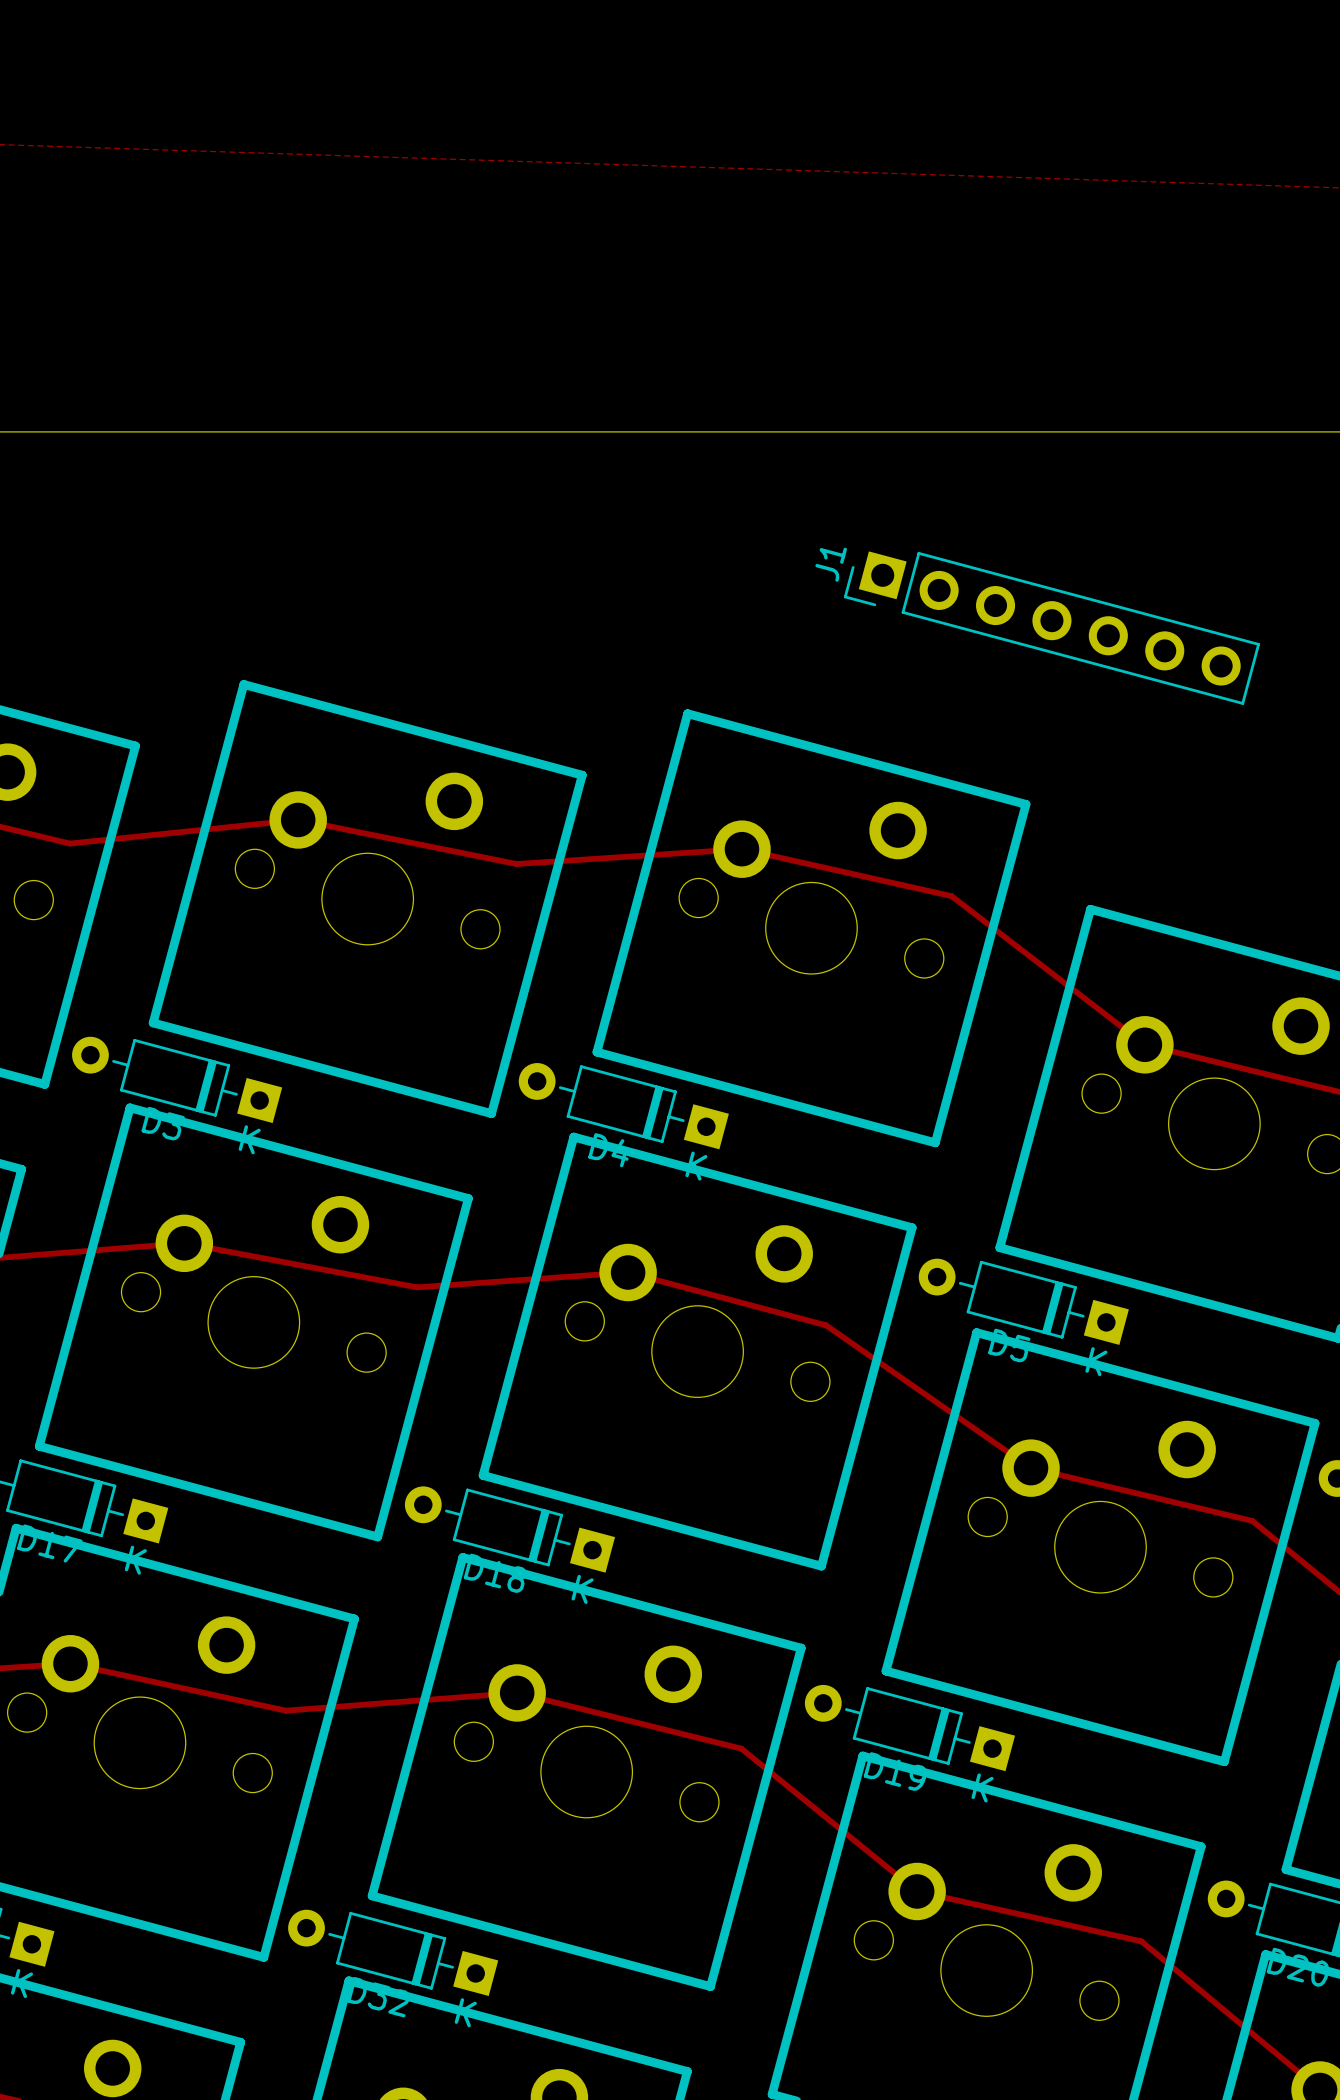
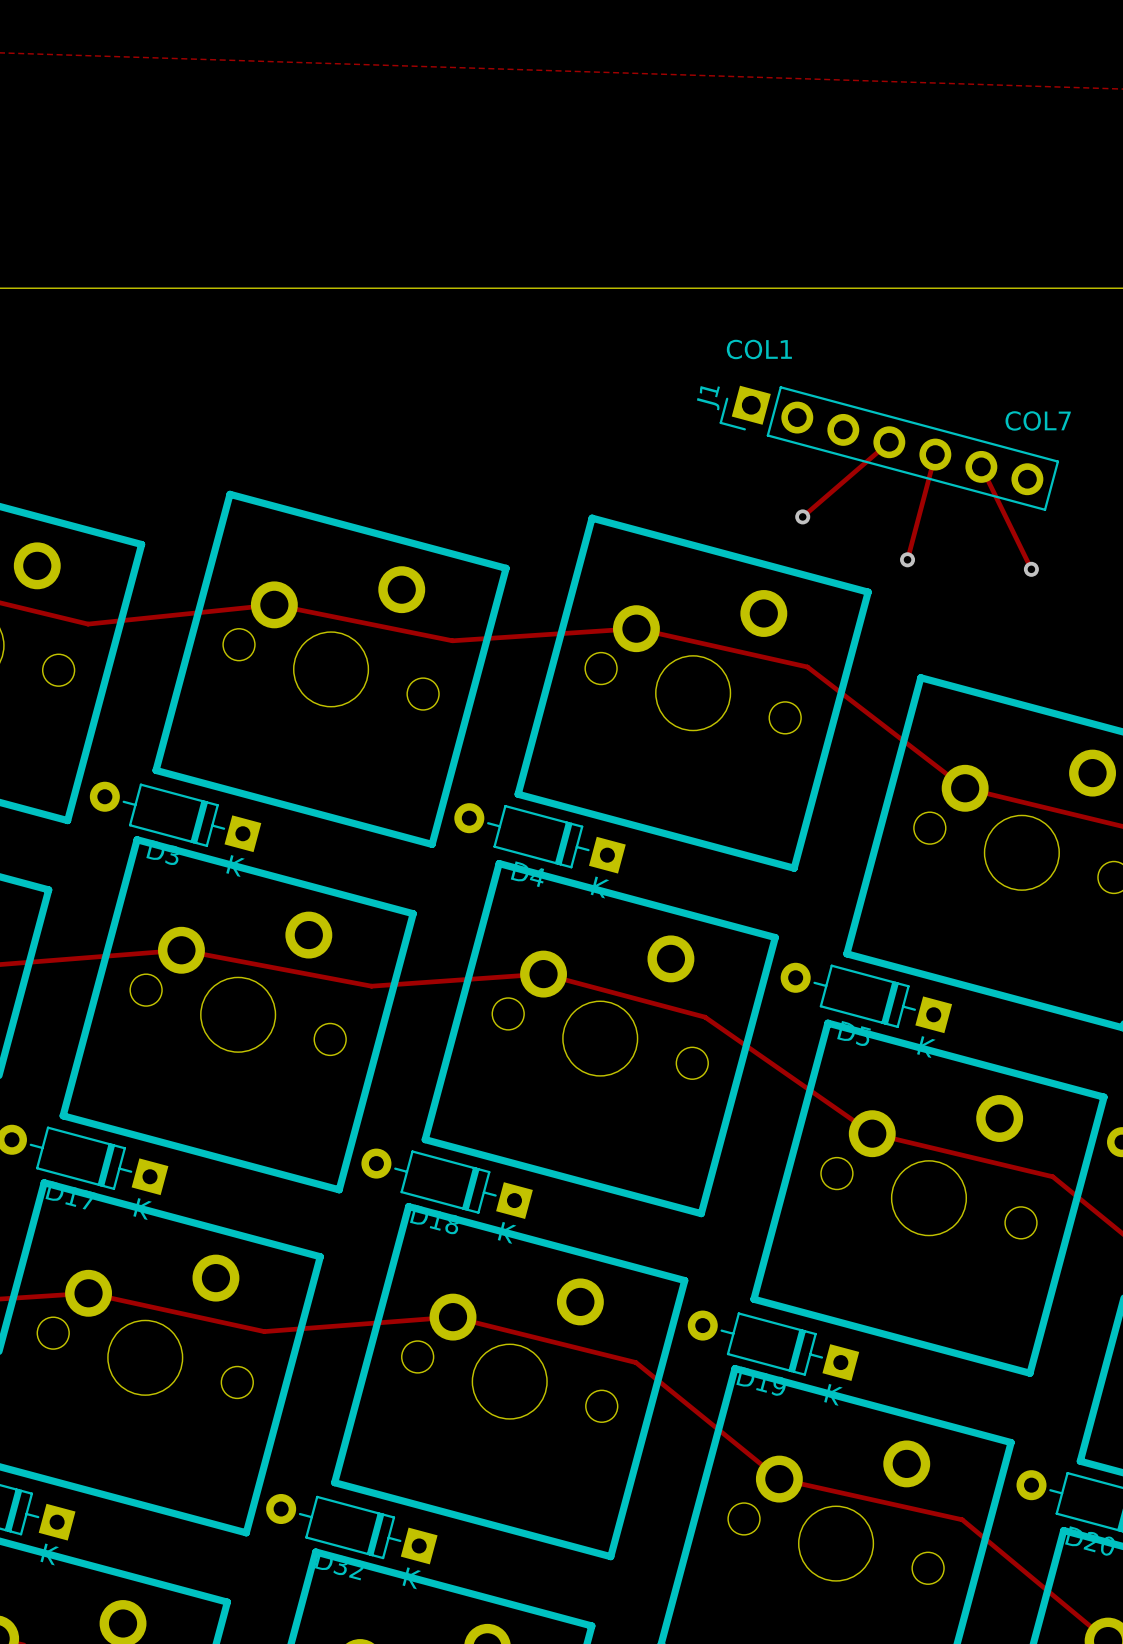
text: none -> COL1 (759, 349)
text: none -> COL7 (1038, 420)
track: none -> (889, 442) (802, 516)
track: none -> (935, 454) (907, 559)
track: none -> (981, 466) (1031, 569)
via: none -> (802, 516)
via: none -> (907, 559)
via: none -> (1031, 569)

